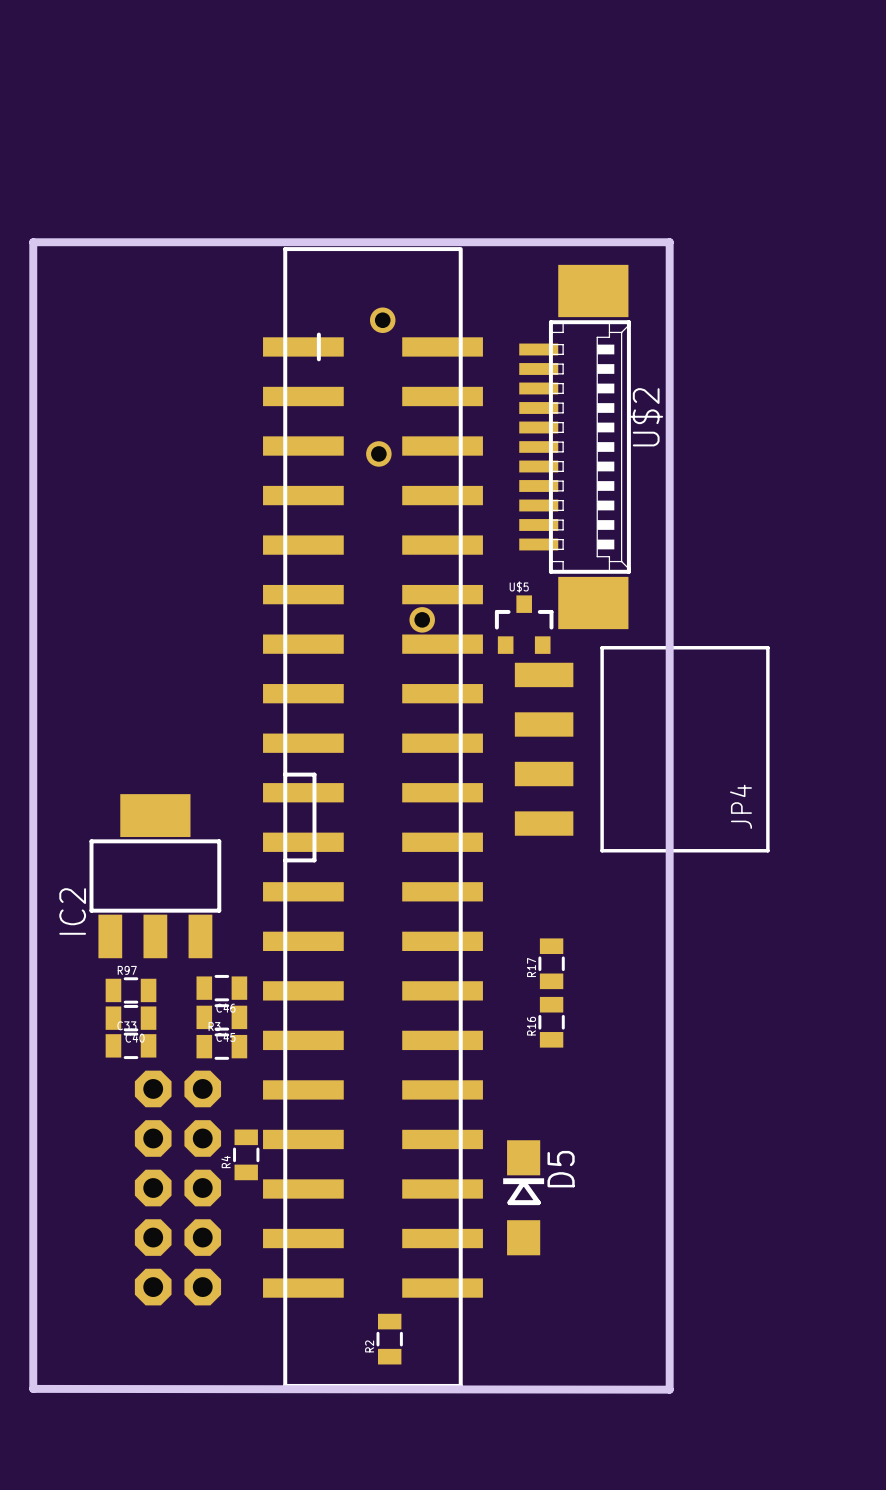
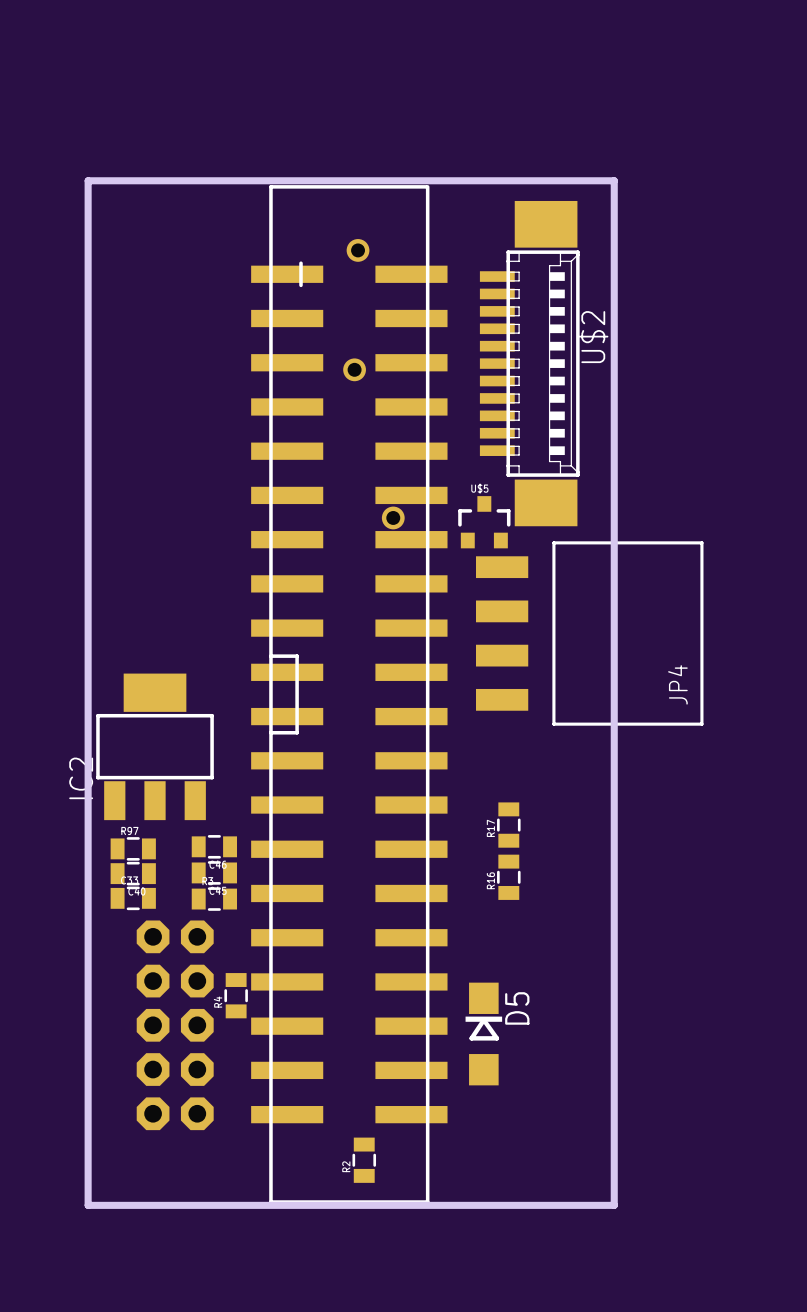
board edge: (80, 242) (33, 242) (33, 1388) (669, 1389) -> (88, 180) (88, 1205) (614, 1205)

